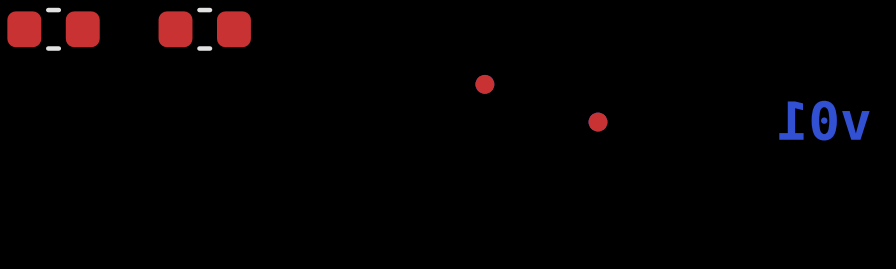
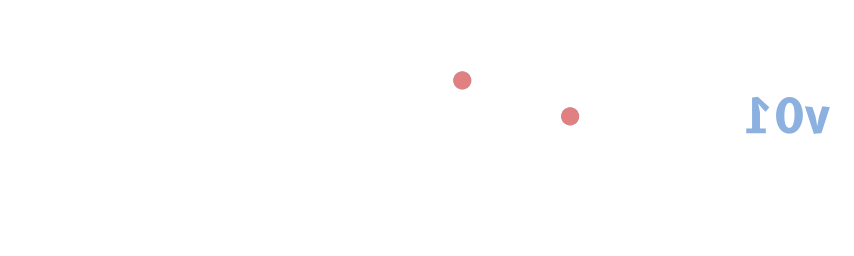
part: (53, 29) -> none
part: (204, 29) -> none

